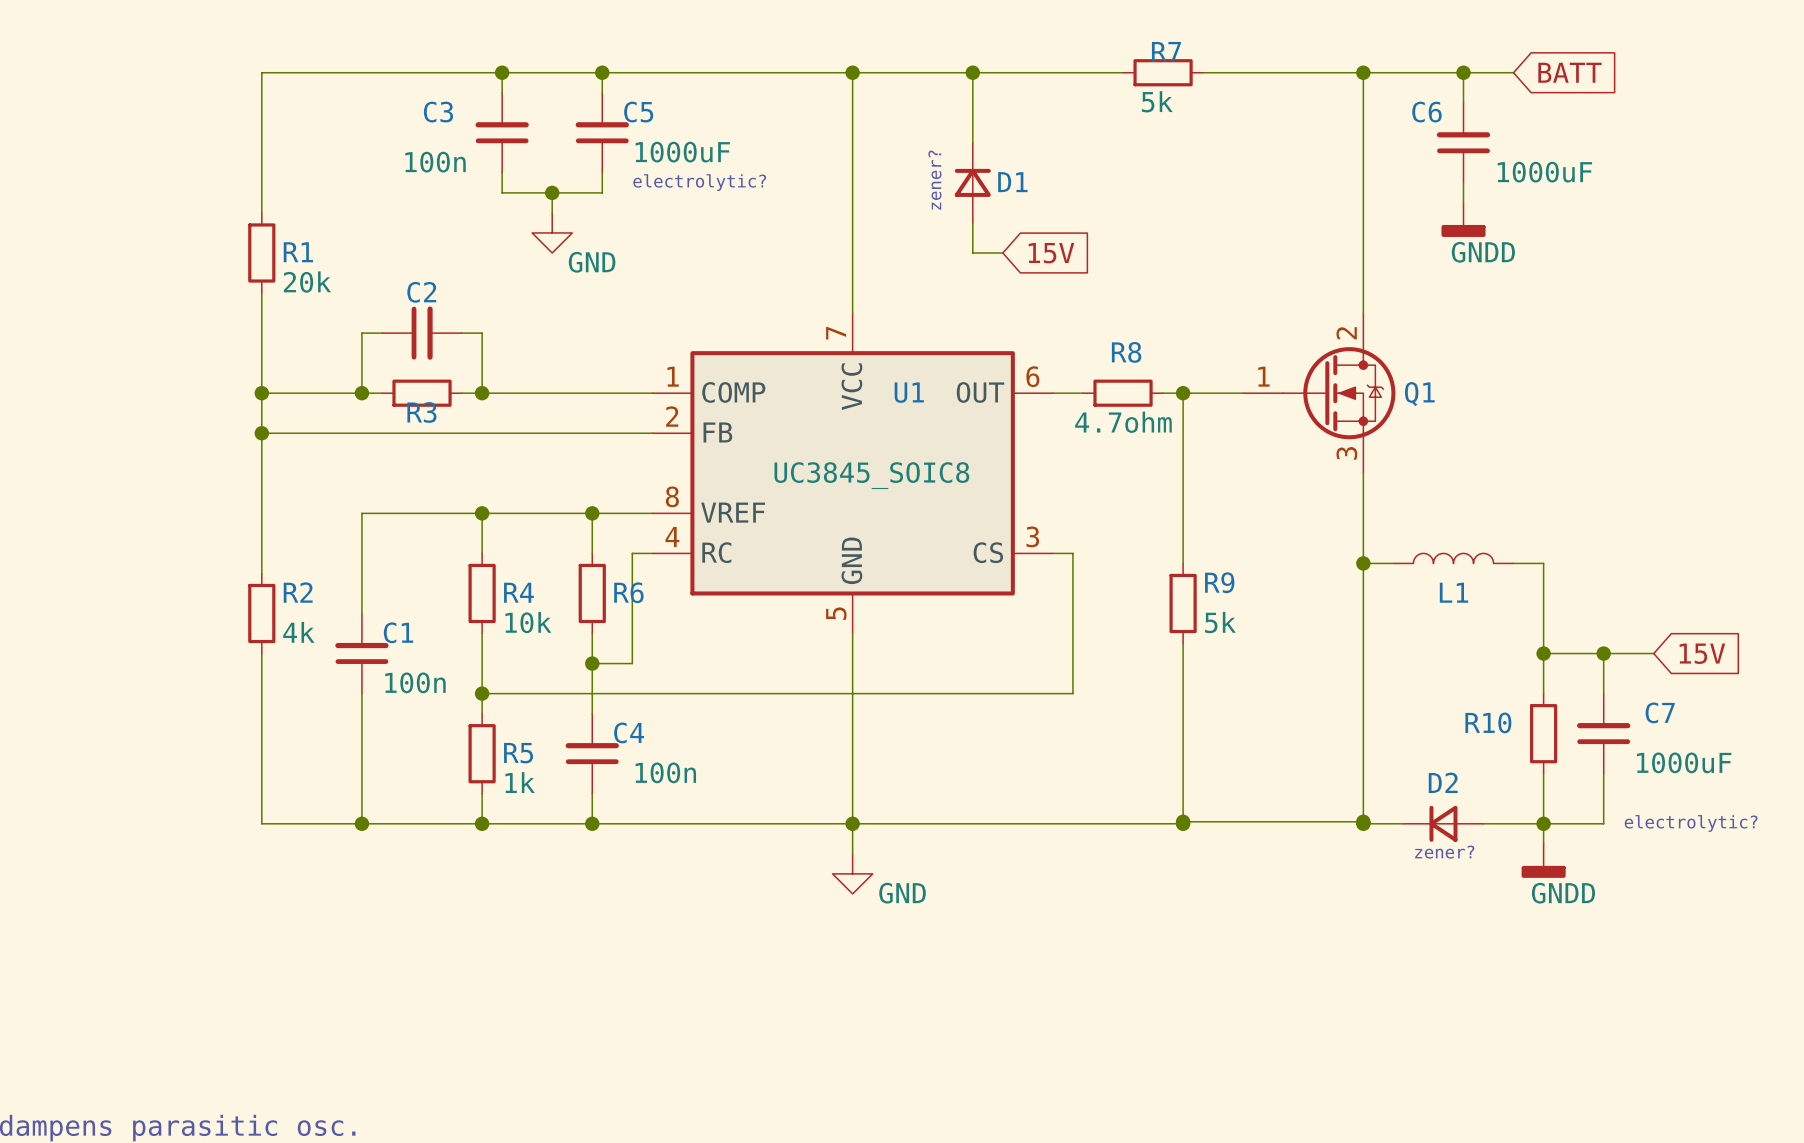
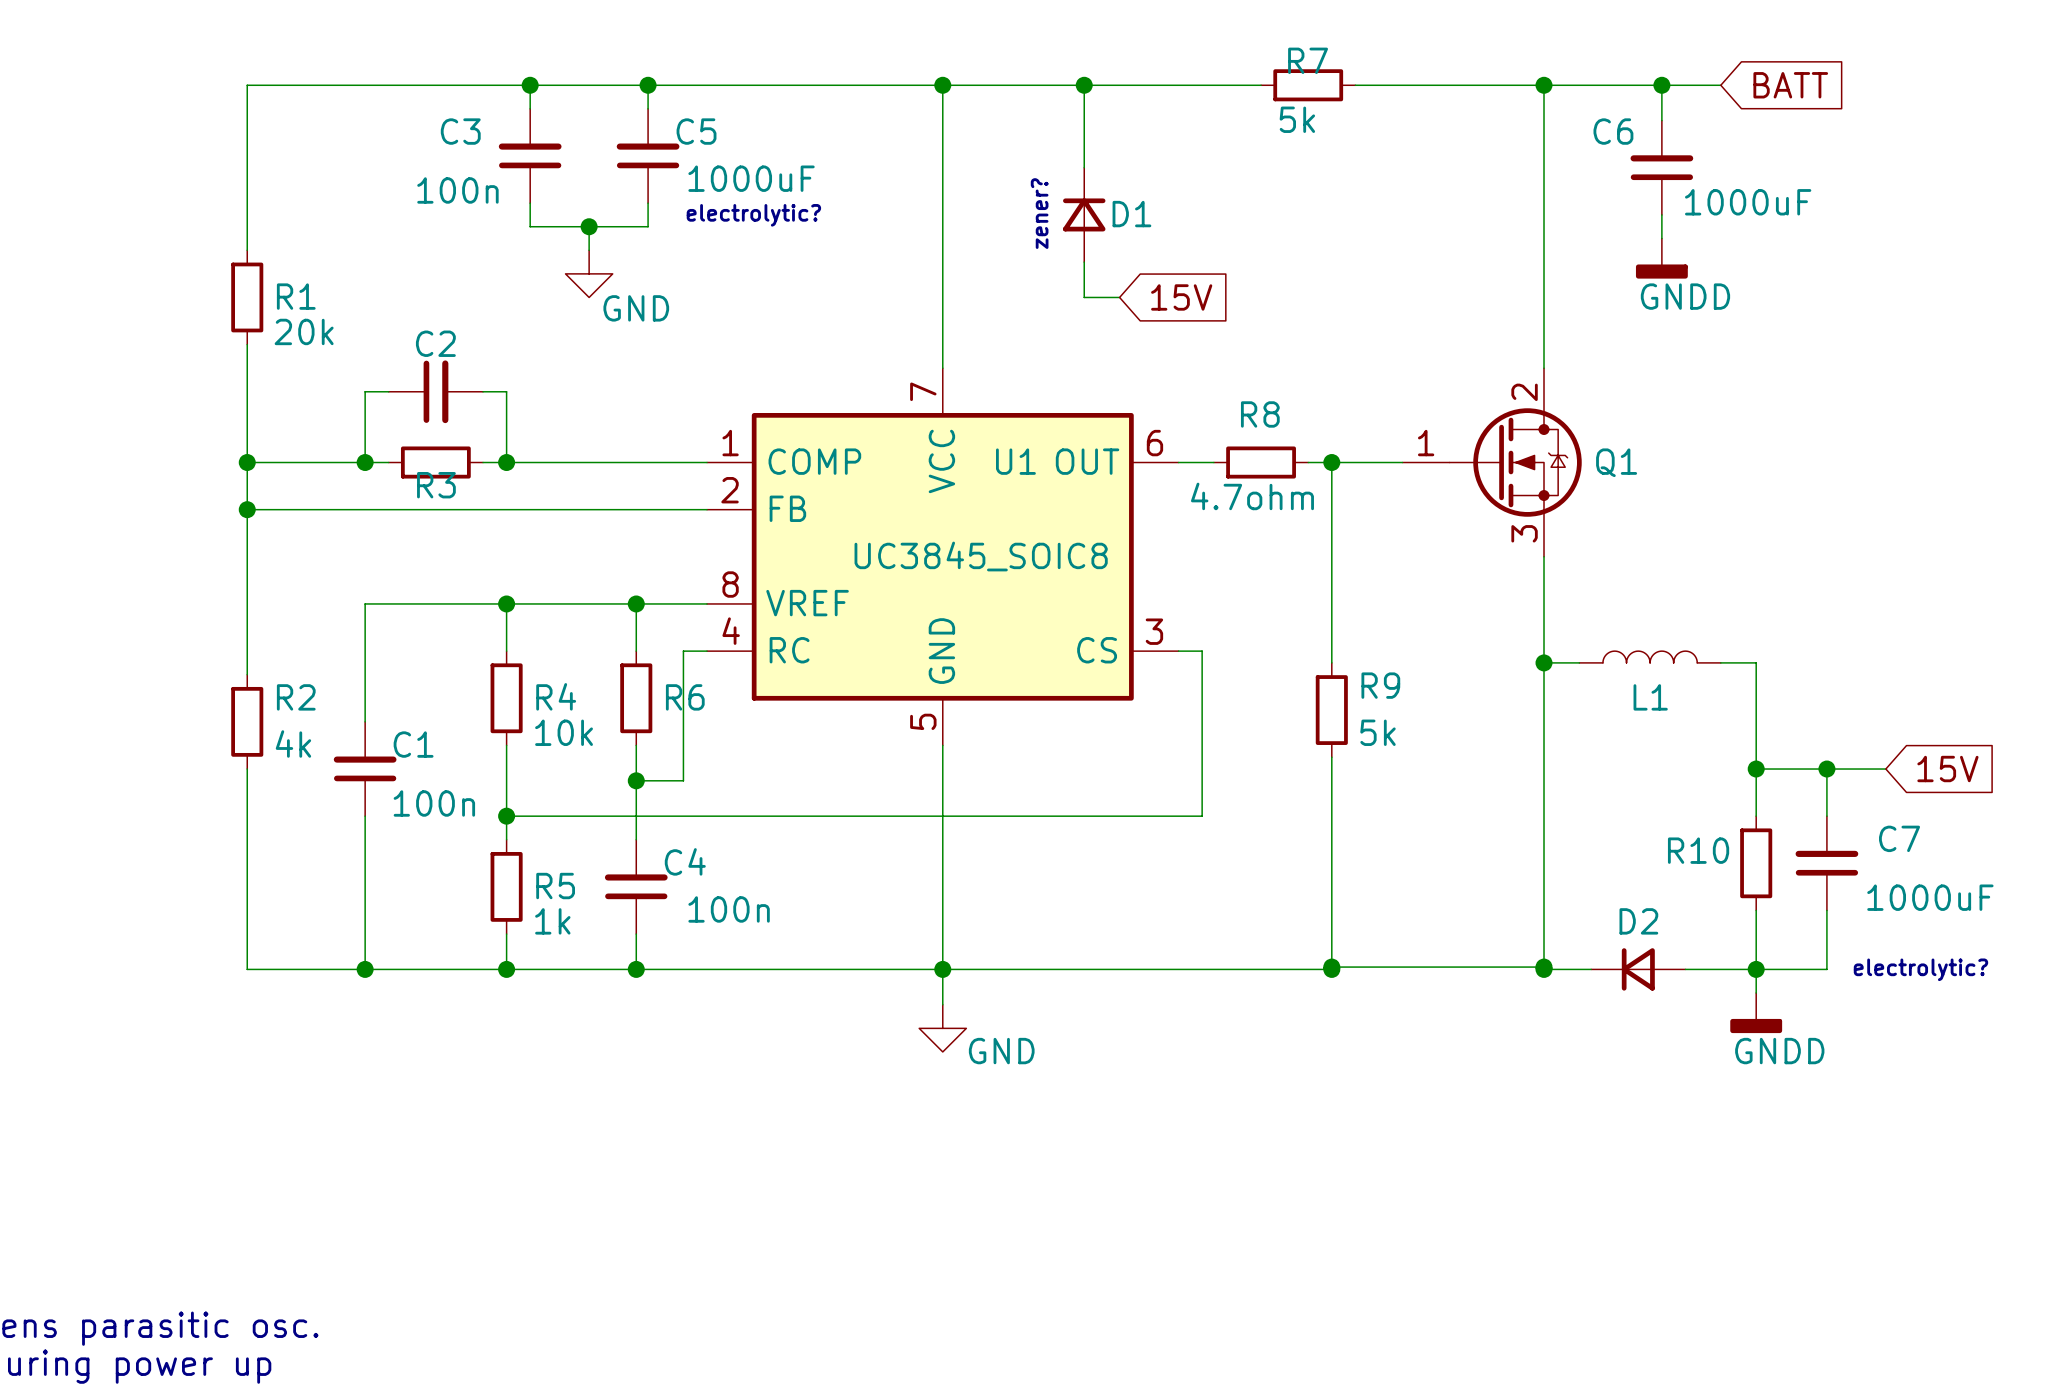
text: zener? (1444, 852) -> none

